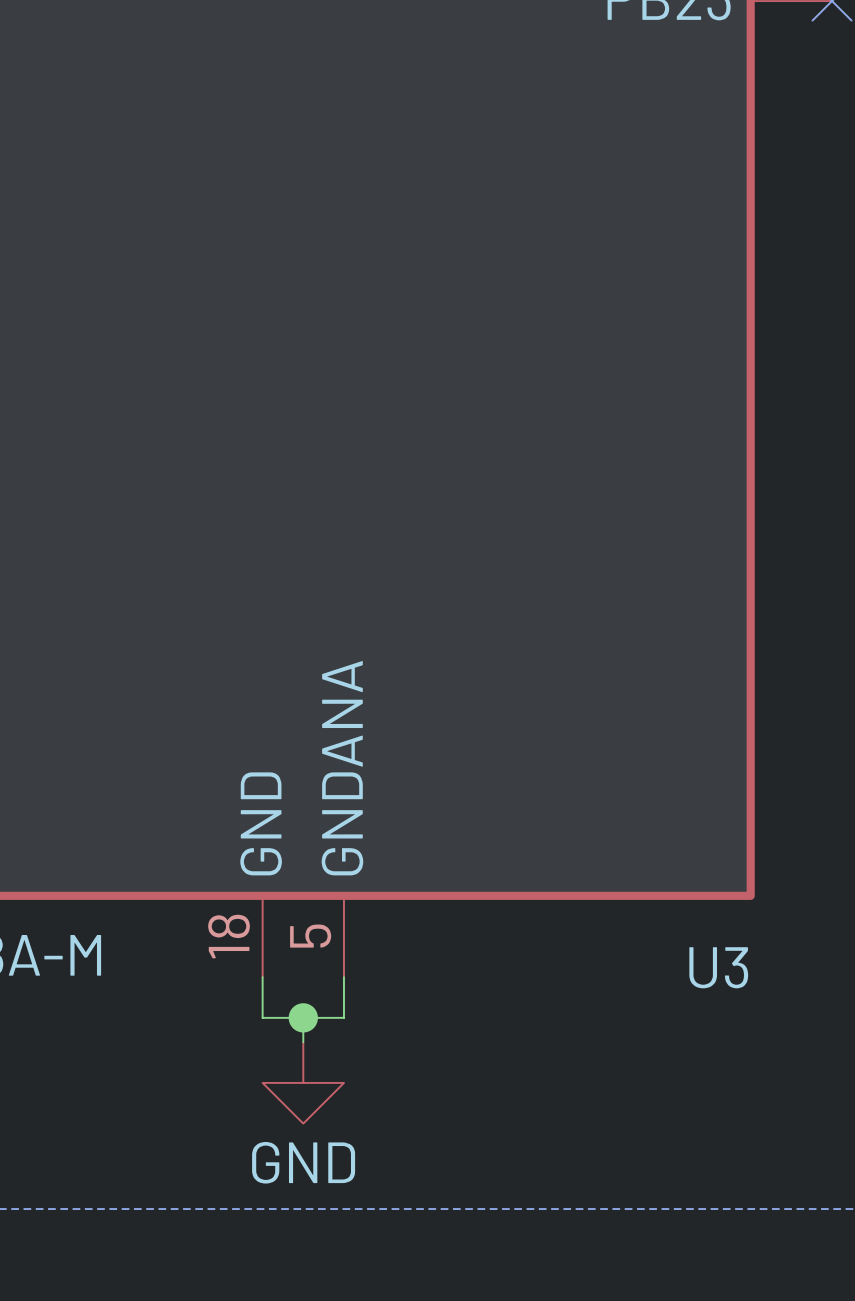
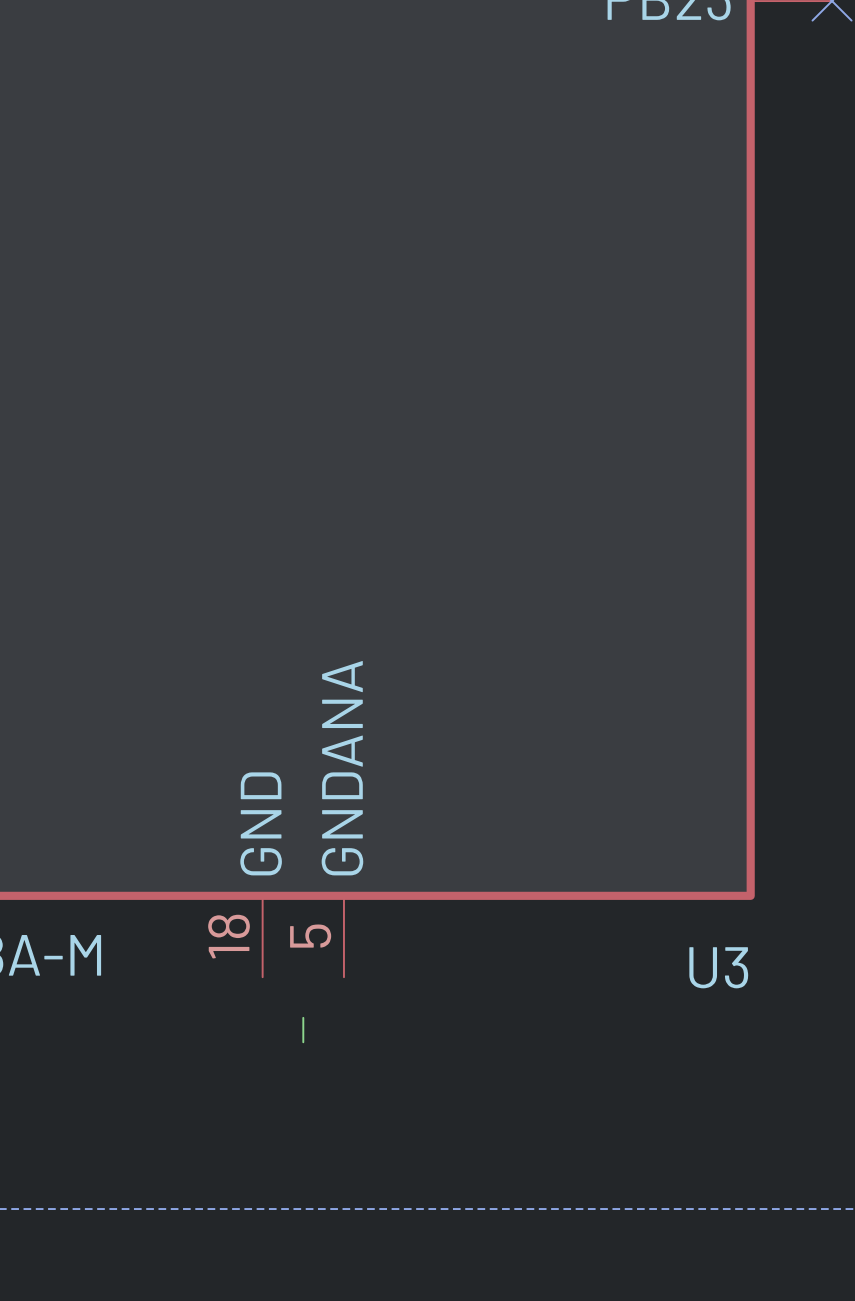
wire: (262, 977) (262, 1017) (343, 1017) (343, 977) -> none
junction: (303, 1017) -> none
power symbol: GND (303, 1082) -> none

